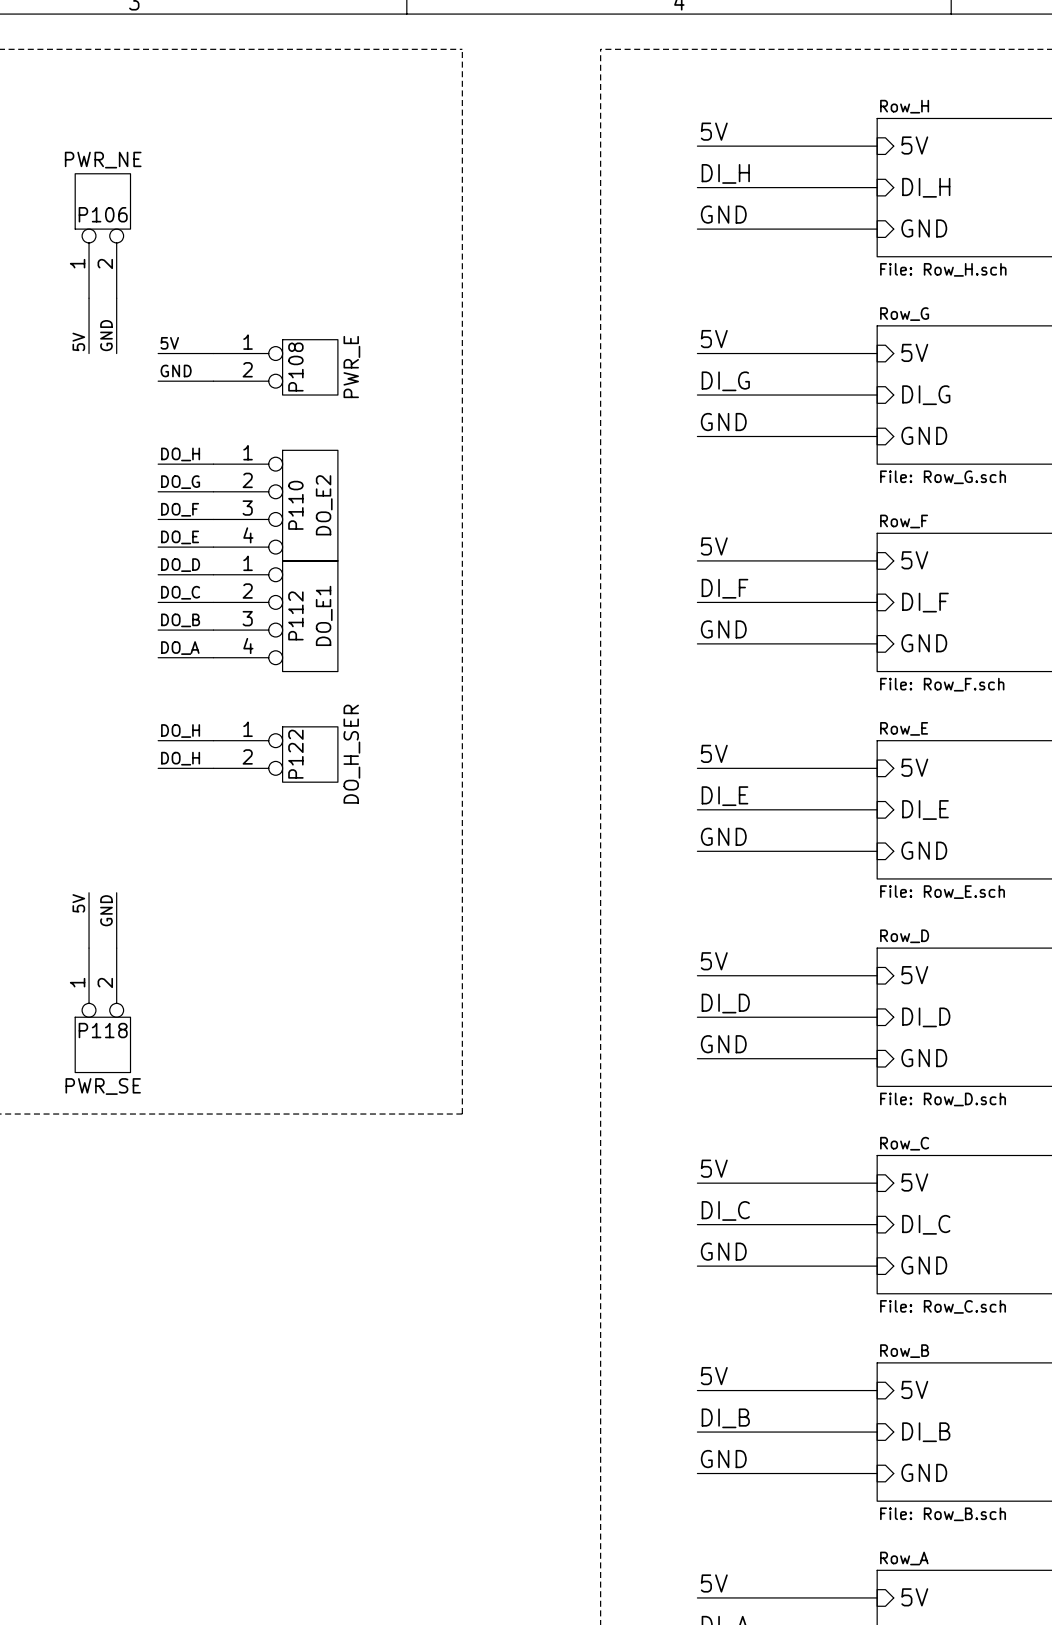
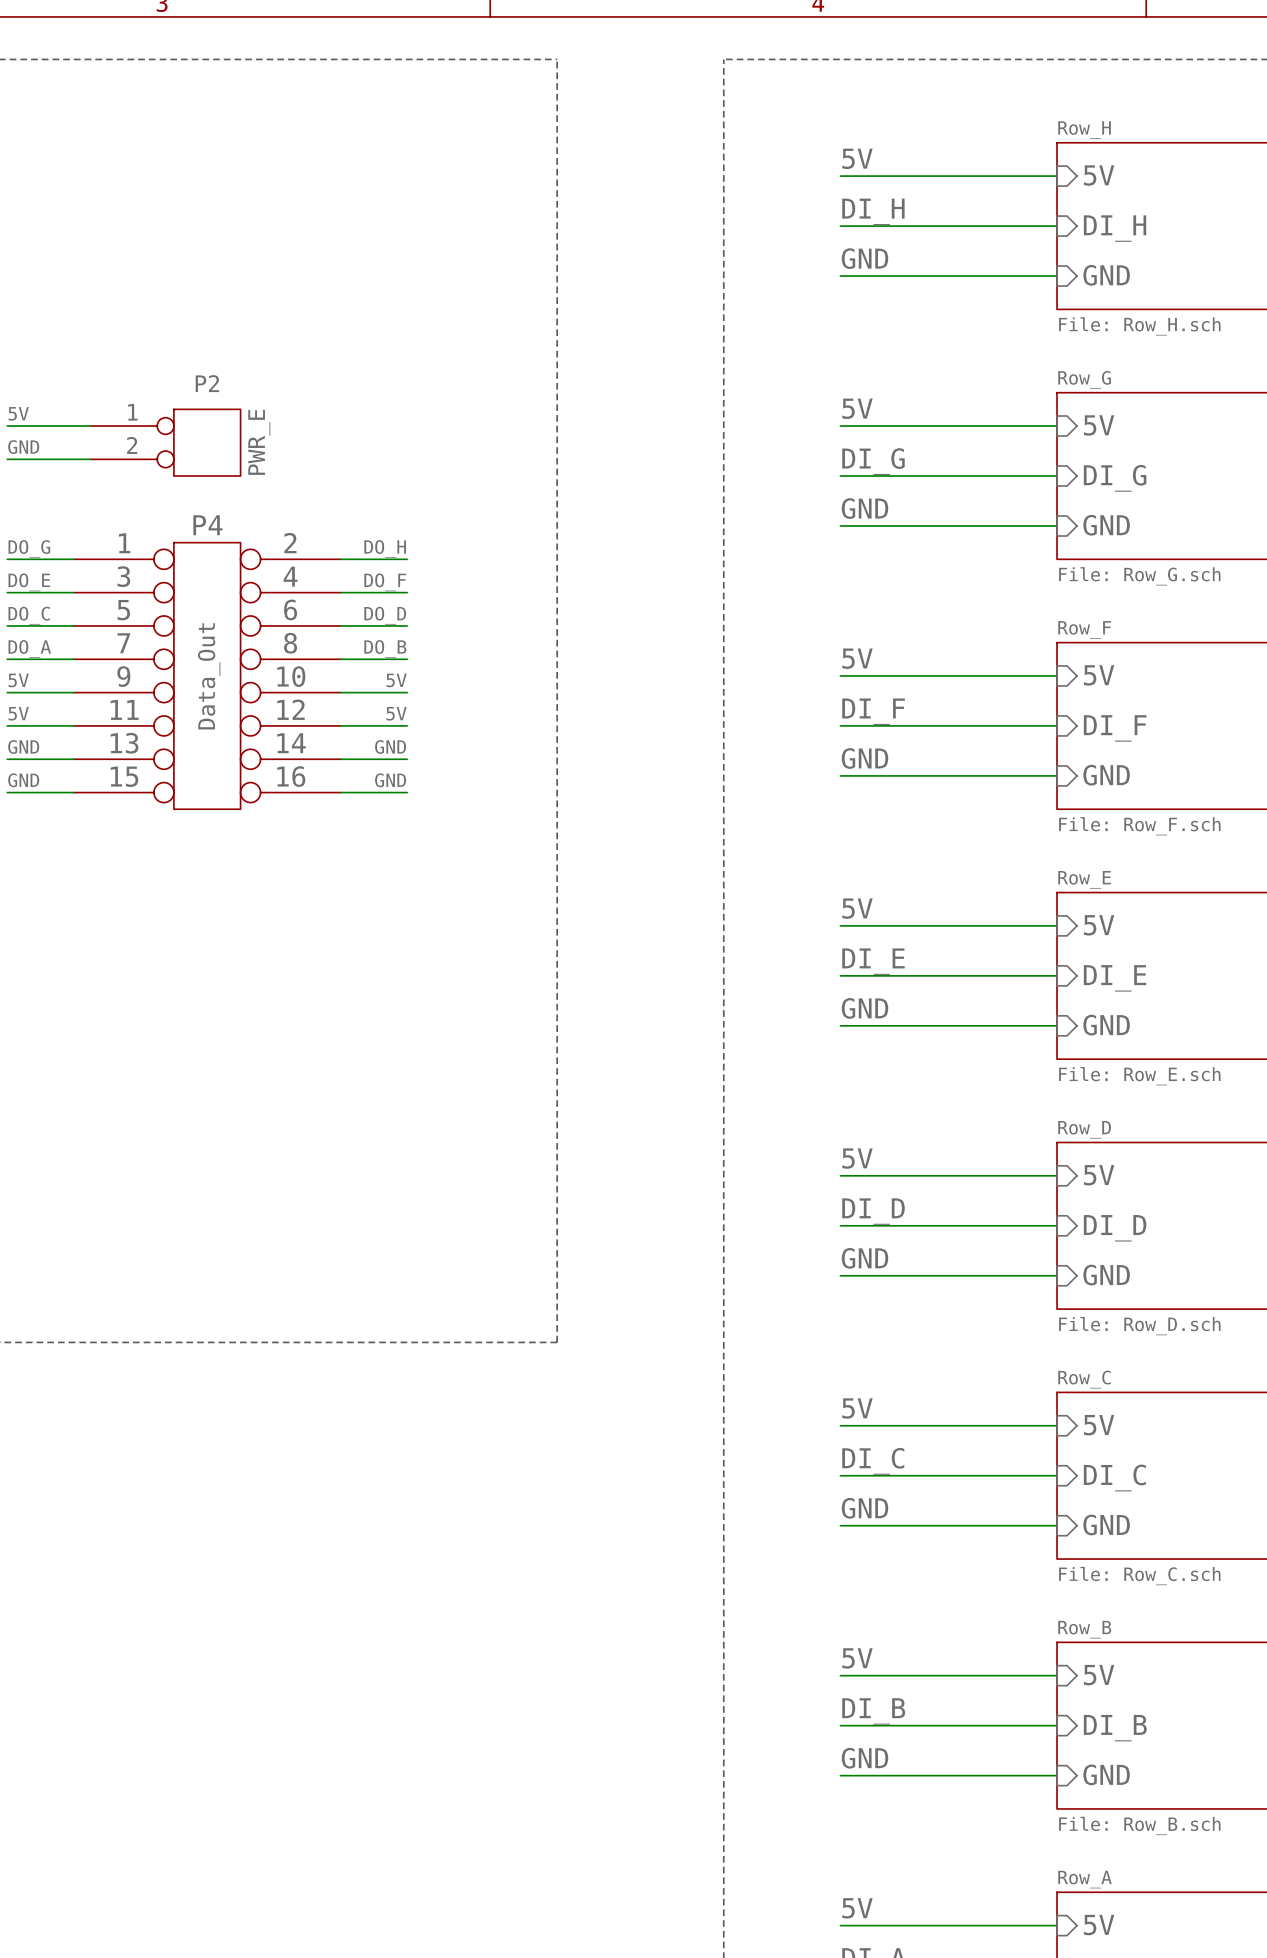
P106: PWR_NE (102, 236) -> none
wire: (89, 298) (89, 353) -> none
wire: (116, 298) (116, 353) -> none
label: GND (106, 335) -> none
label: 5V (78, 341) -> none
label: none -> 5V (18, 413)
label: 5V (169, 343) -> none
wire: none -> (7, 426) (90, 426)
wire: (158, 353) (213, 353) -> (7, 592) (73, 592)
P2: none -> PWR_E (165, 442)
P108: PWR_E (275, 367) -> none
label: none -> GND (23, 447)
label: GND (176, 370) -> none
wire: none -> (7, 459) (90, 459)
wire: (158, 381) (213, 381) -> (7, 559) (73, 559)
label: DO_H (180, 454) -> none
label: none -> DO_H (385, 549)
wire: (158, 464) (213, 464) -> (340, 559) (407, 559)
label position: DO_G (180, 482) -> DO_G (29, 549)
wire: (158, 491) (213, 491) -> (340, 592) (407, 592)
P110: DO_E2 (275, 505) -> none
label position: DO_F (180, 509) -> DO_F (385, 582)
wire: none -> (7, 625) (73, 625)
wire: (158, 519) (213, 519) -> (340, 625) (407, 625)
label position: DO_E (180, 537) -> DO_E (29, 582)
wire: none -> (7, 659) (73, 659)
wire: (158, 547) (213, 547) -> (340, 659) (407, 659)
P4: none -> Data_Out (207, 675)
label: none -> 5V (18, 680)
label: none -> 5V (396, 680)
label position: DO_D (180, 565) -> DO_D (385, 615)
wire: none -> (7, 692) (73, 692)
wire: (158, 574) (213, 574) -> (340, 692) (407, 692)
label: none -> 5V (18, 713)
label position: DO_C (180, 592) -> DO_C (29, 615)
label: none -> 5V (396, 713)
wire: none -> (7, 725) (73, 725)
wire: (158, 602) (213, 602) -> (340, 725) (407, 725)
P112: DO_E1 (275, 616) -> none
label: none -> GND (23, 746)
label: none -> GND (390, 746)
label position: DO_B (180, 620) -> DO_B (385, 649)
wire: (158, 630) (213, 630) -> (340, 759) (407, 759)
label: none -> GND (23, 780)
label: none -> GND (390, 780)
label position: DO_A (180, 648) -> DO_A (29, 649)
wire: (158, 657) (213, 657) -> (340, 792) (407, 792)
label: DO_H (180, 731) -> none
wire: (158, 740) (213, 740) -> (7, 792) (73, 792)
P122: DO_H_SER (275, 754) -> none
label: DO_H (180, 758) -> none
wire: (158, 768) (213, 768) -> (7, 759) (73, 759)
wire: (89, 892) (89, 948) -> none
wire: (116, 892) (116, 948) -> none
label: 5V (78, 903) -> none
label: GND (106, 910) -> none
P118: PWR_SE (102, 1010) -> none

